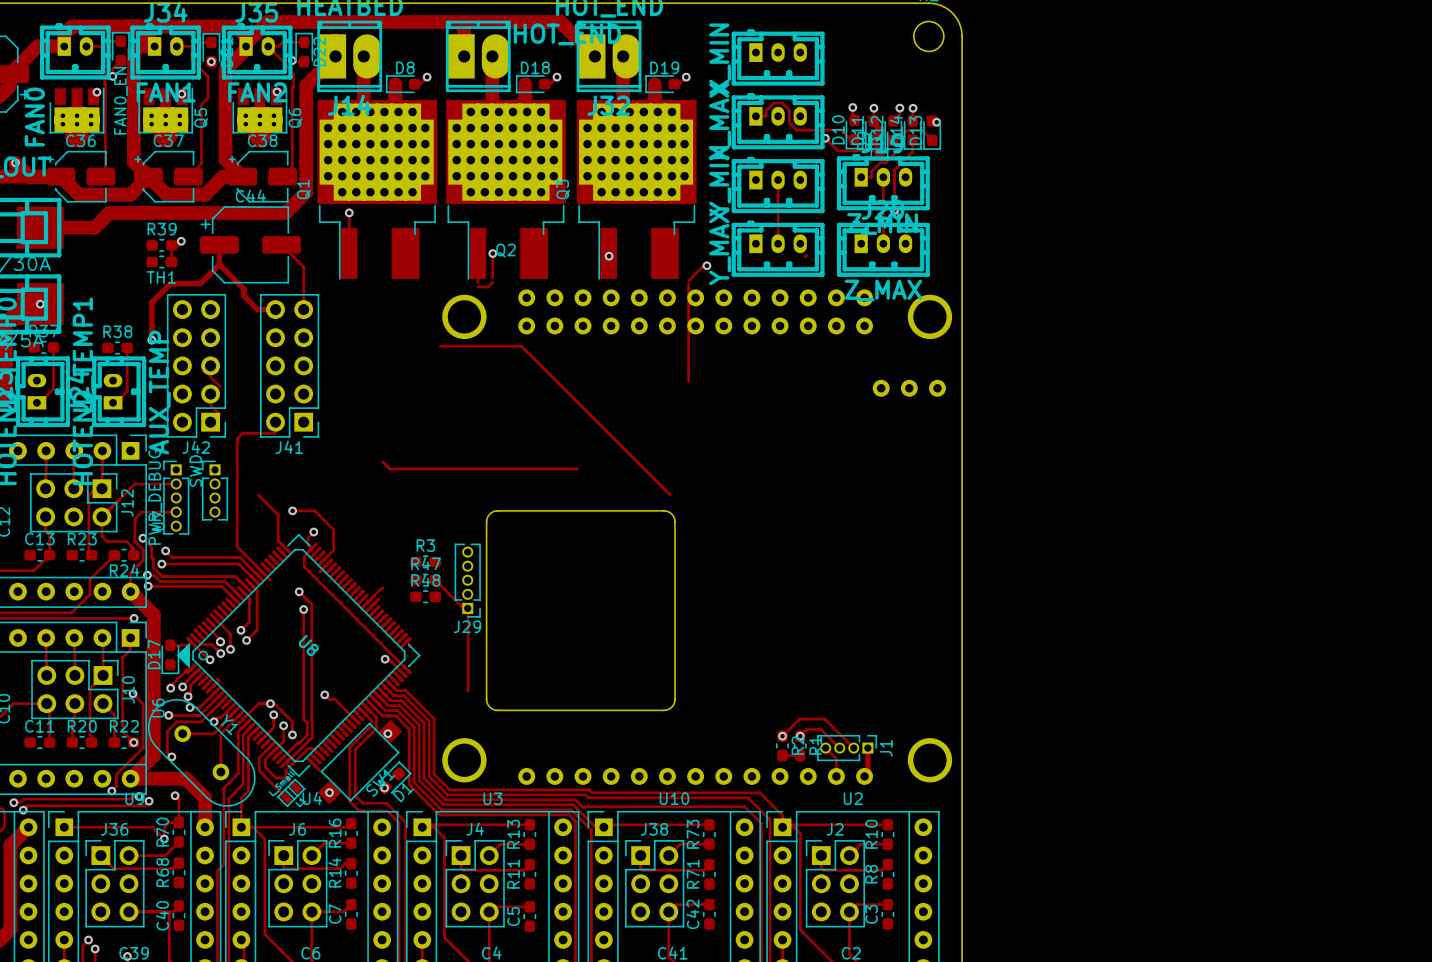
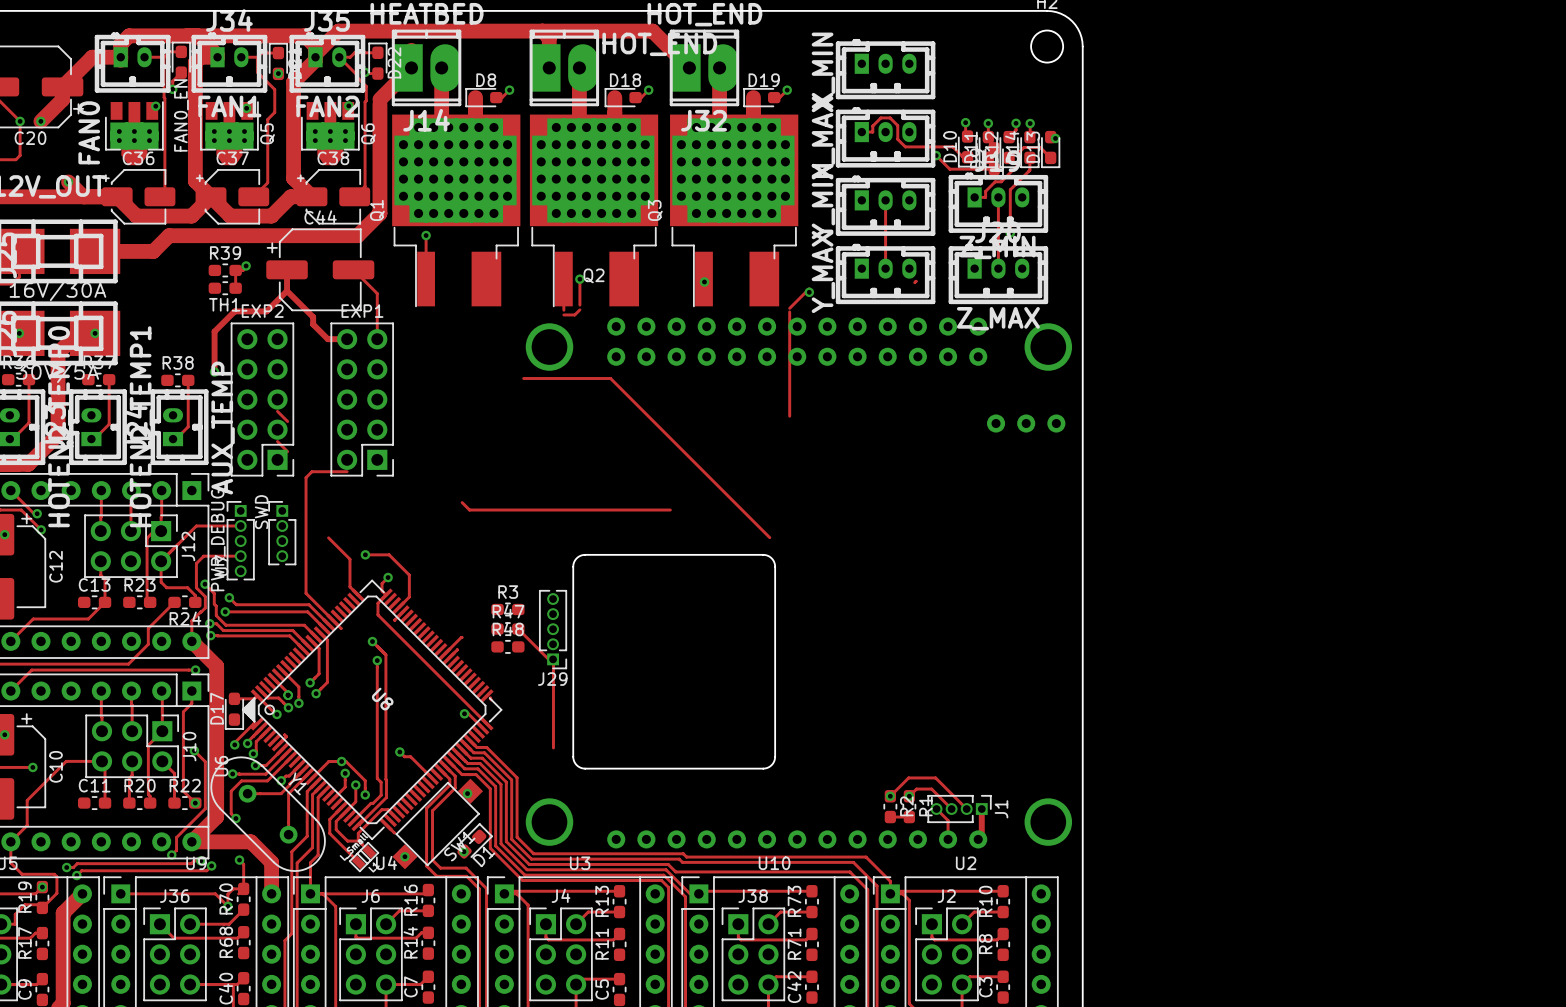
J42 value: none -> EXP2 (262, 311)
J41 value: none -> EXP1 (362, 311)
J42 name: J42 (196, 447) -> none
J41 name: J41 (289, 447) -> none

